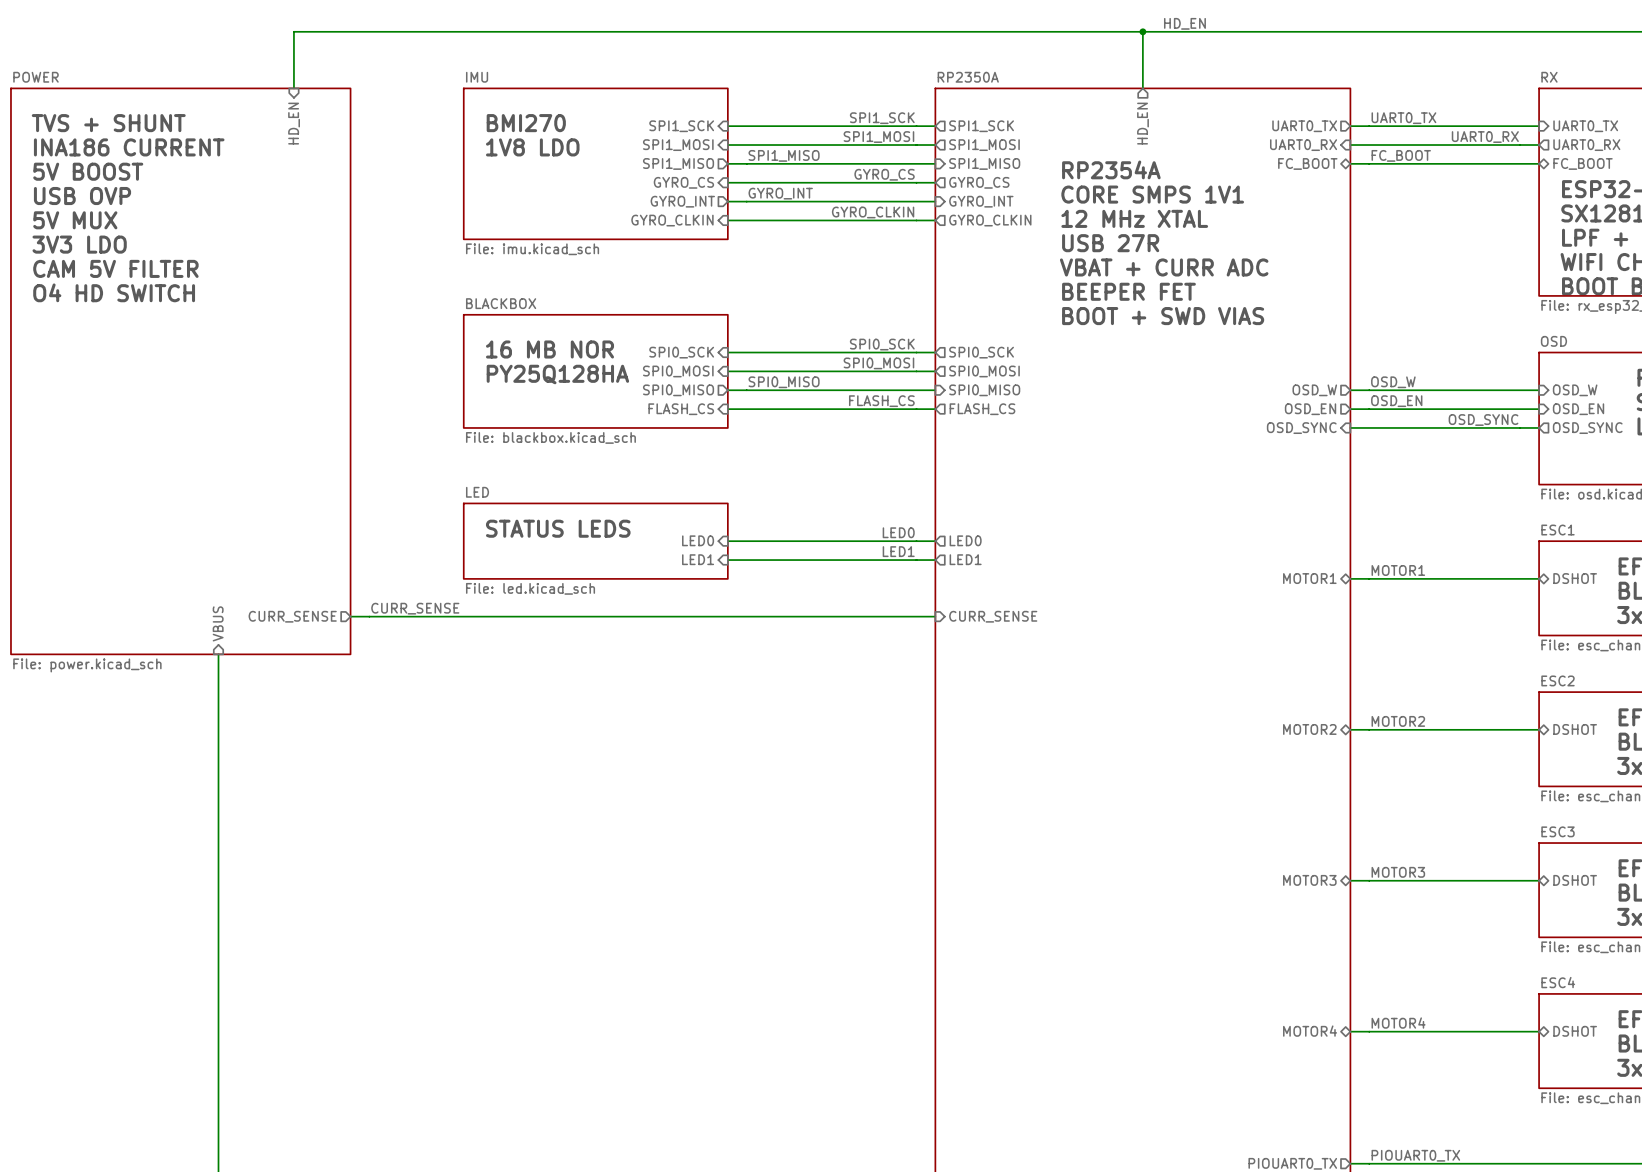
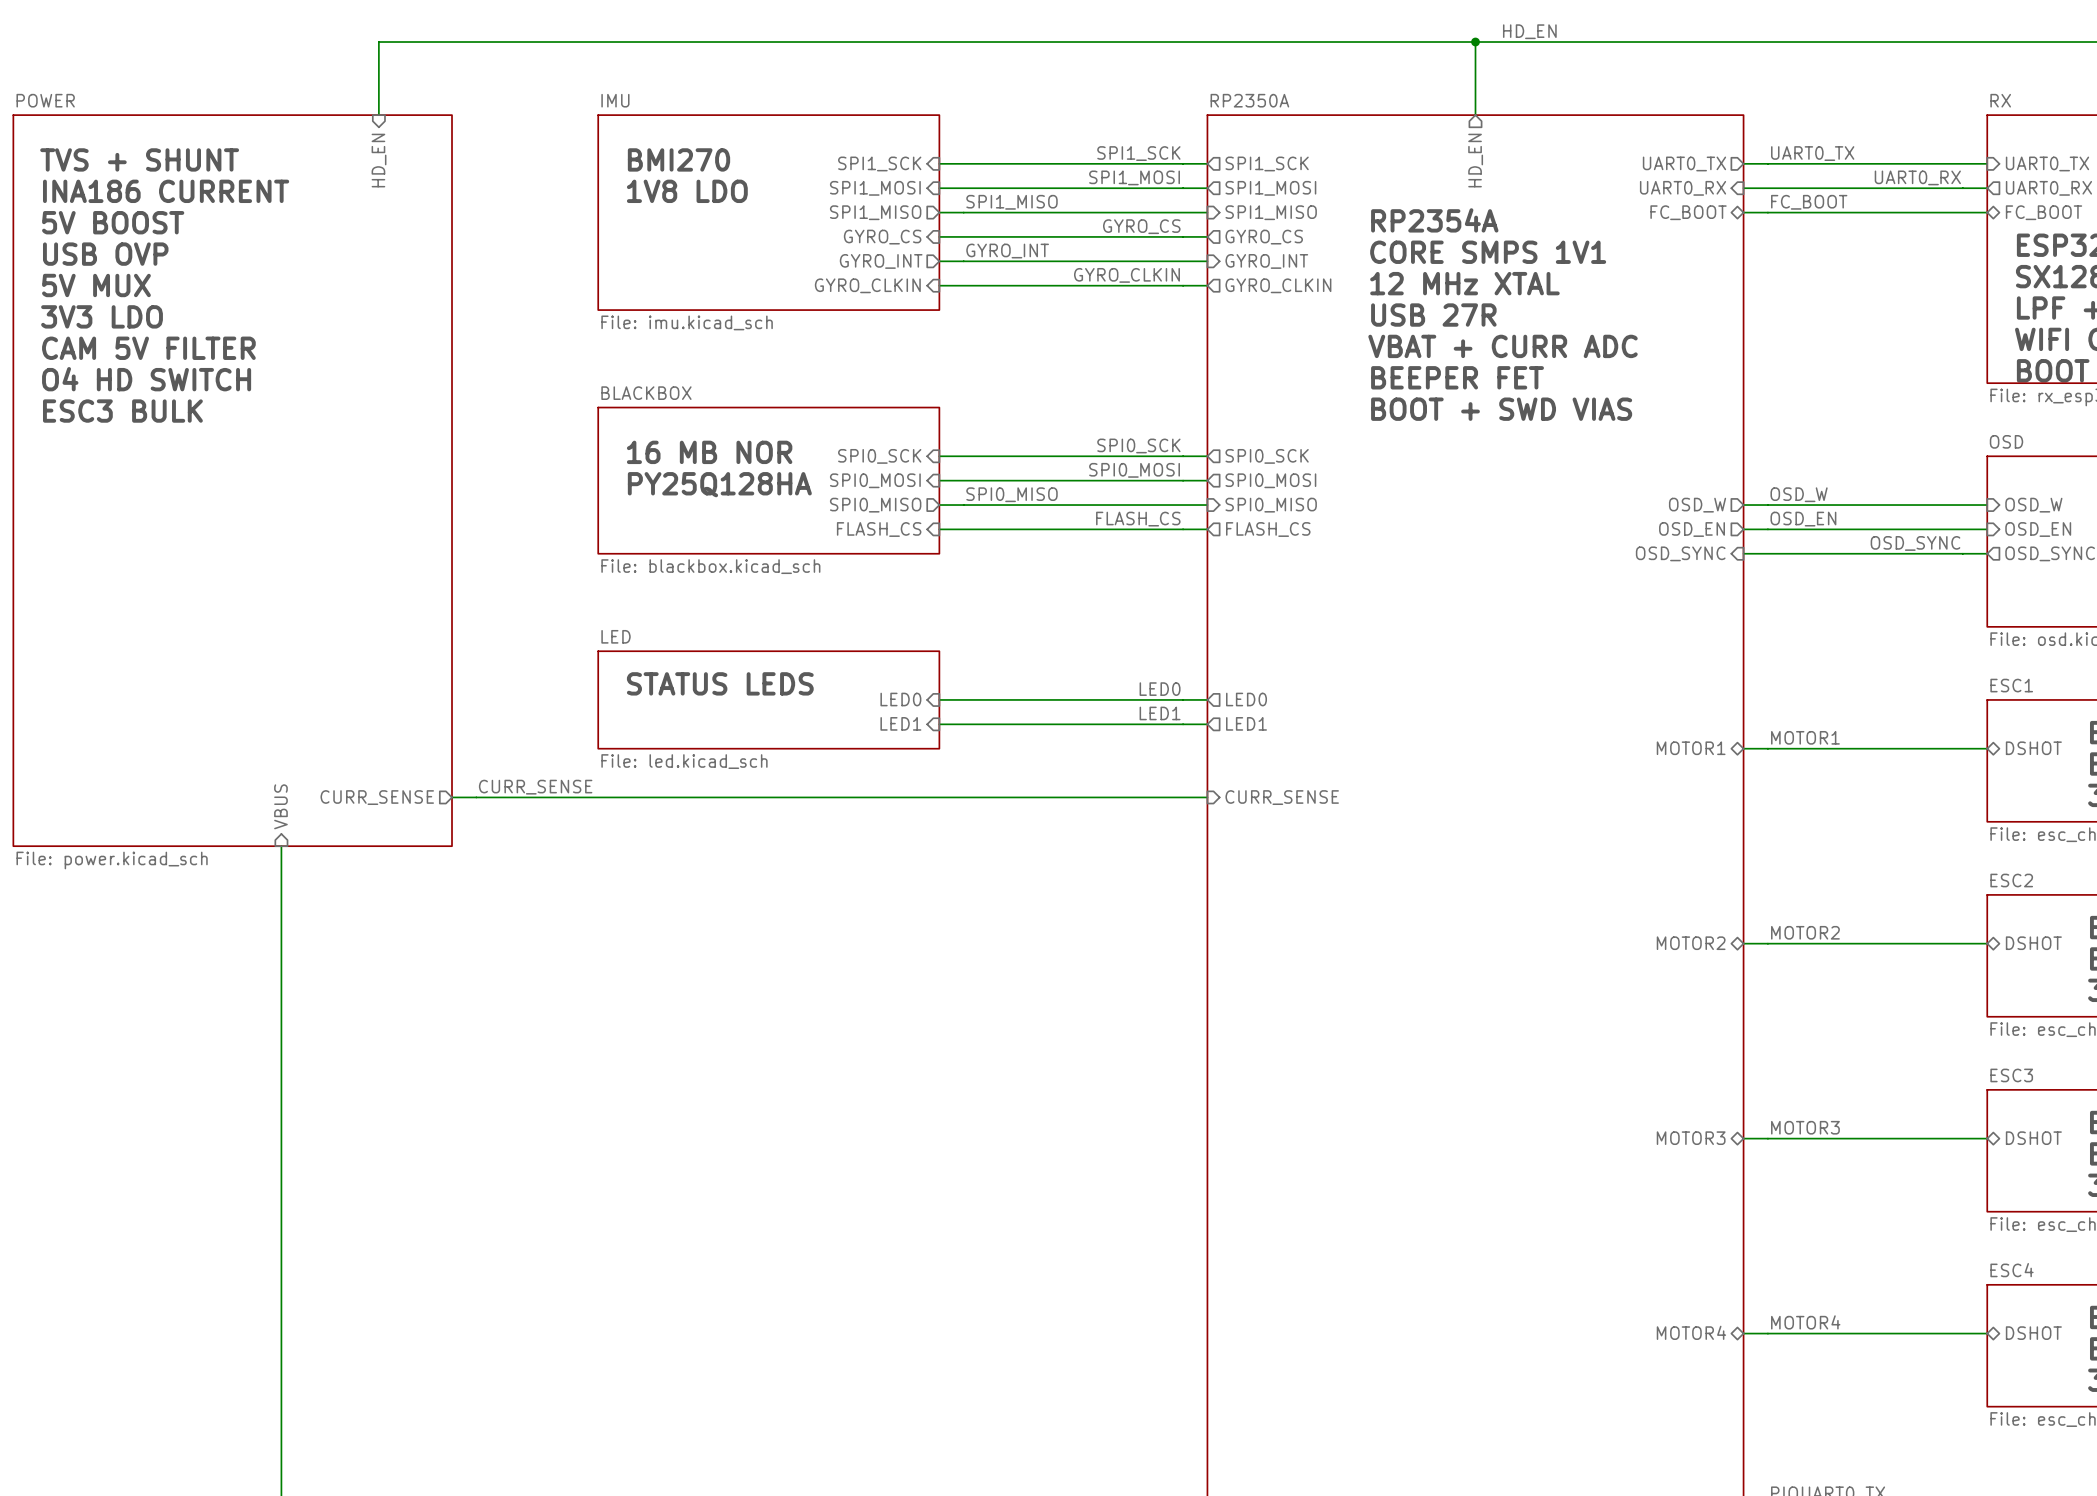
text: none -> ESC3 BULK (122, 411)

